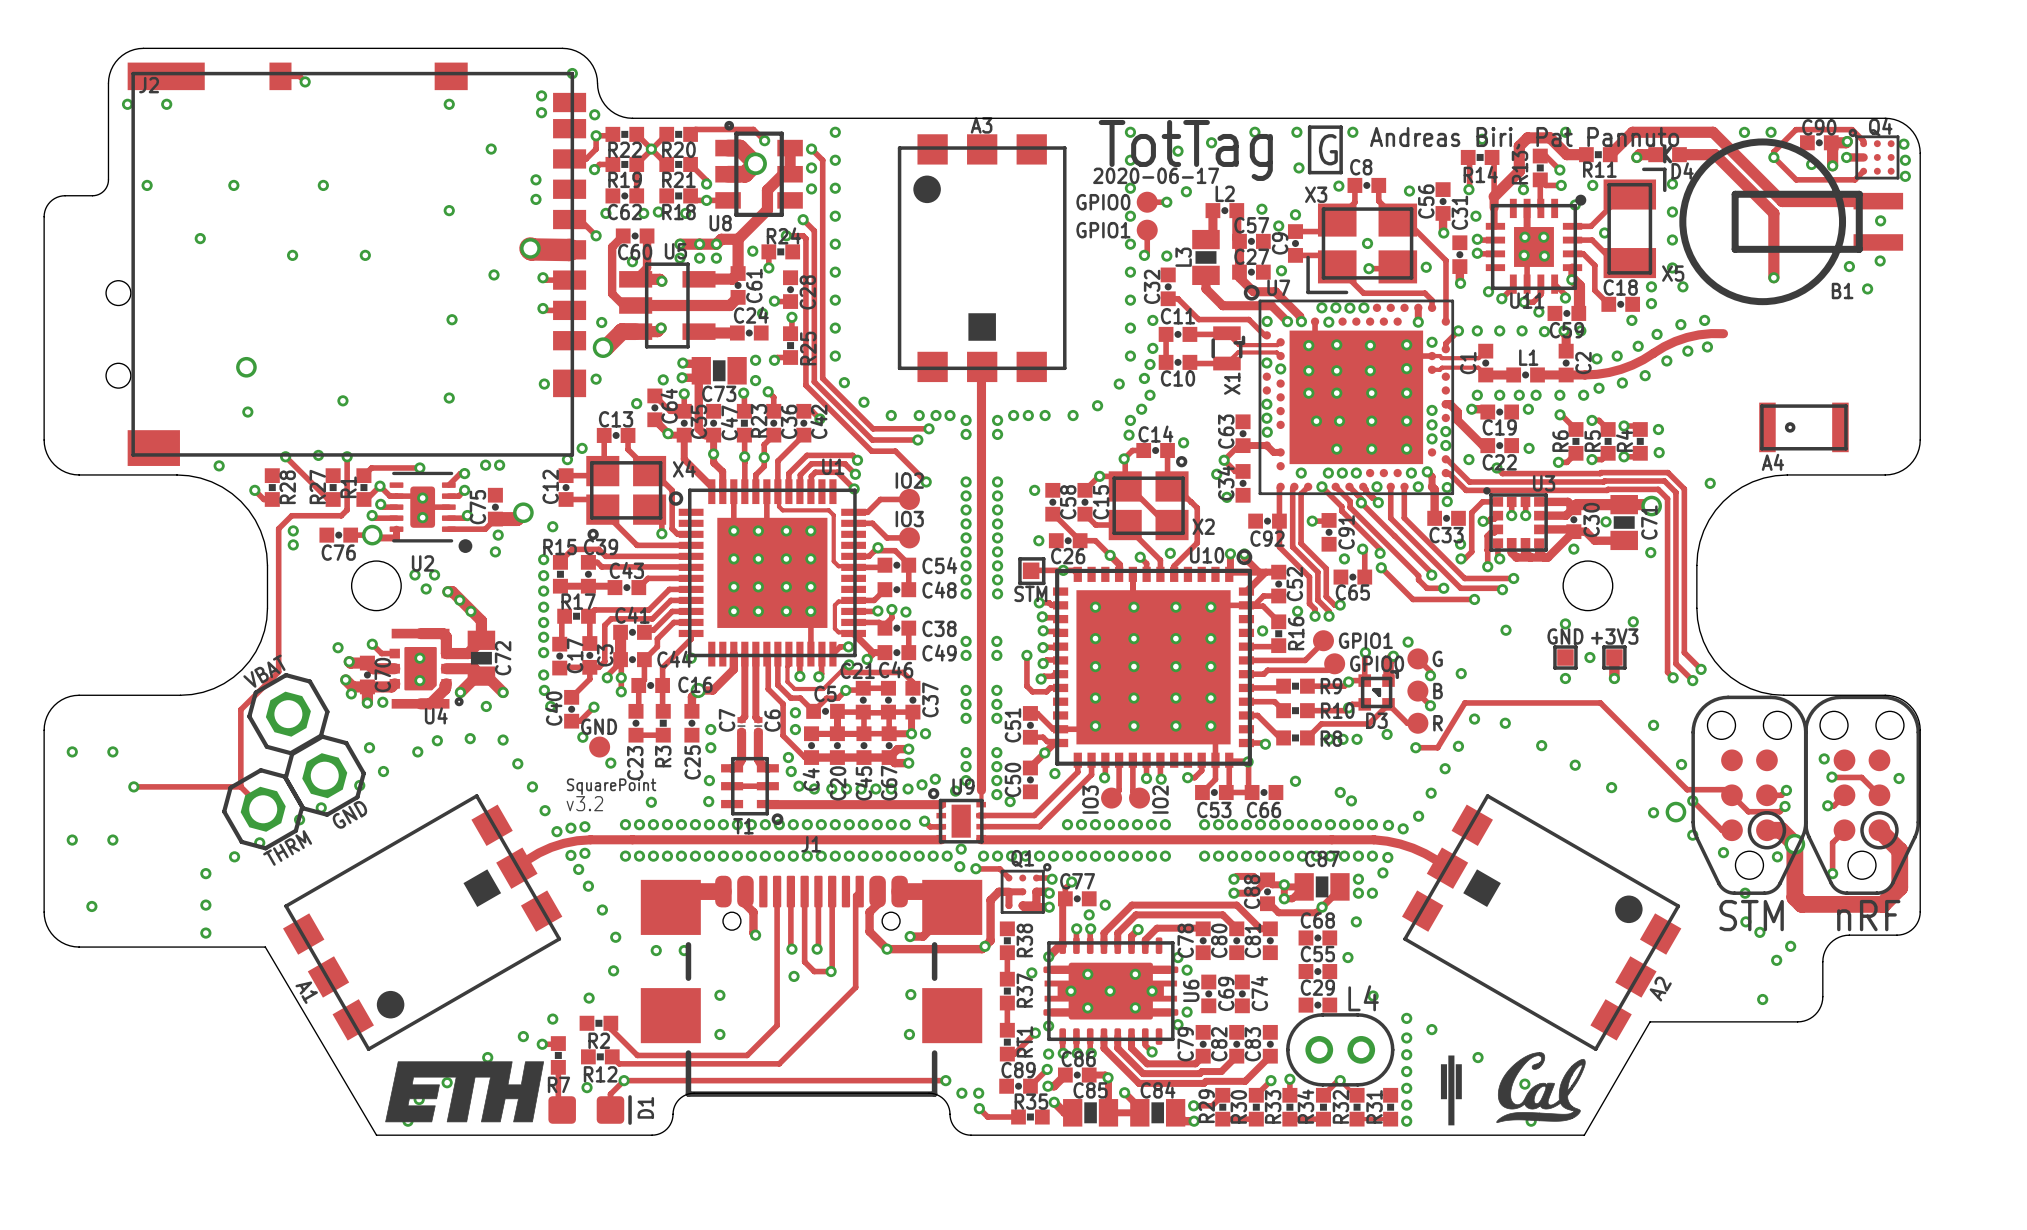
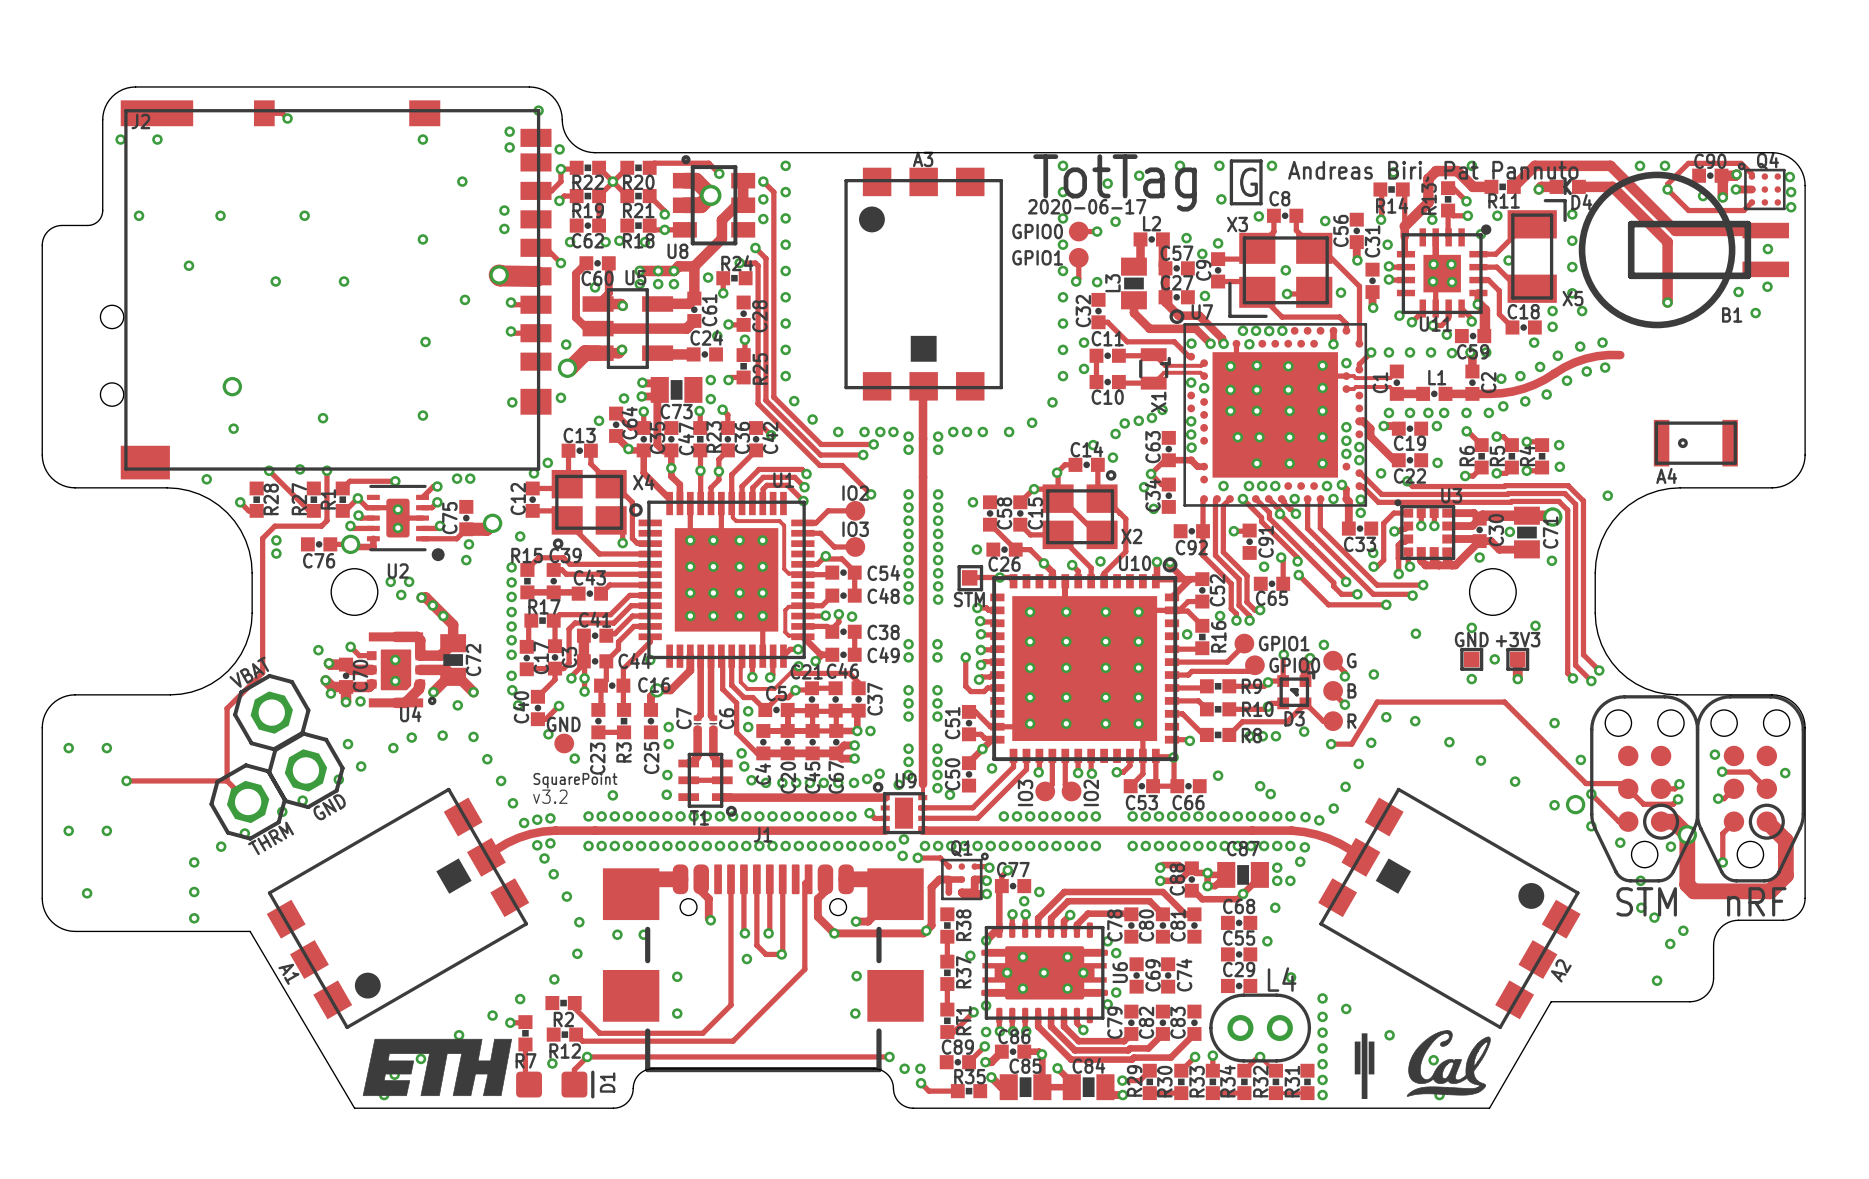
via: (1150, 364) -> none
via: (1144, 378) -> none
via: none -> (1162, 409)
via: (1150, 395) -> none
via: none -> (1151, 417)
via: none -> (1138, 420)
via: none -> (1124, 423)
via: (1141, 409) -> none
via: none -> (1115, 433)
via: (1130, 420) -> none
via: none -> (1093, 445)
via: (1129, 435) -> none

